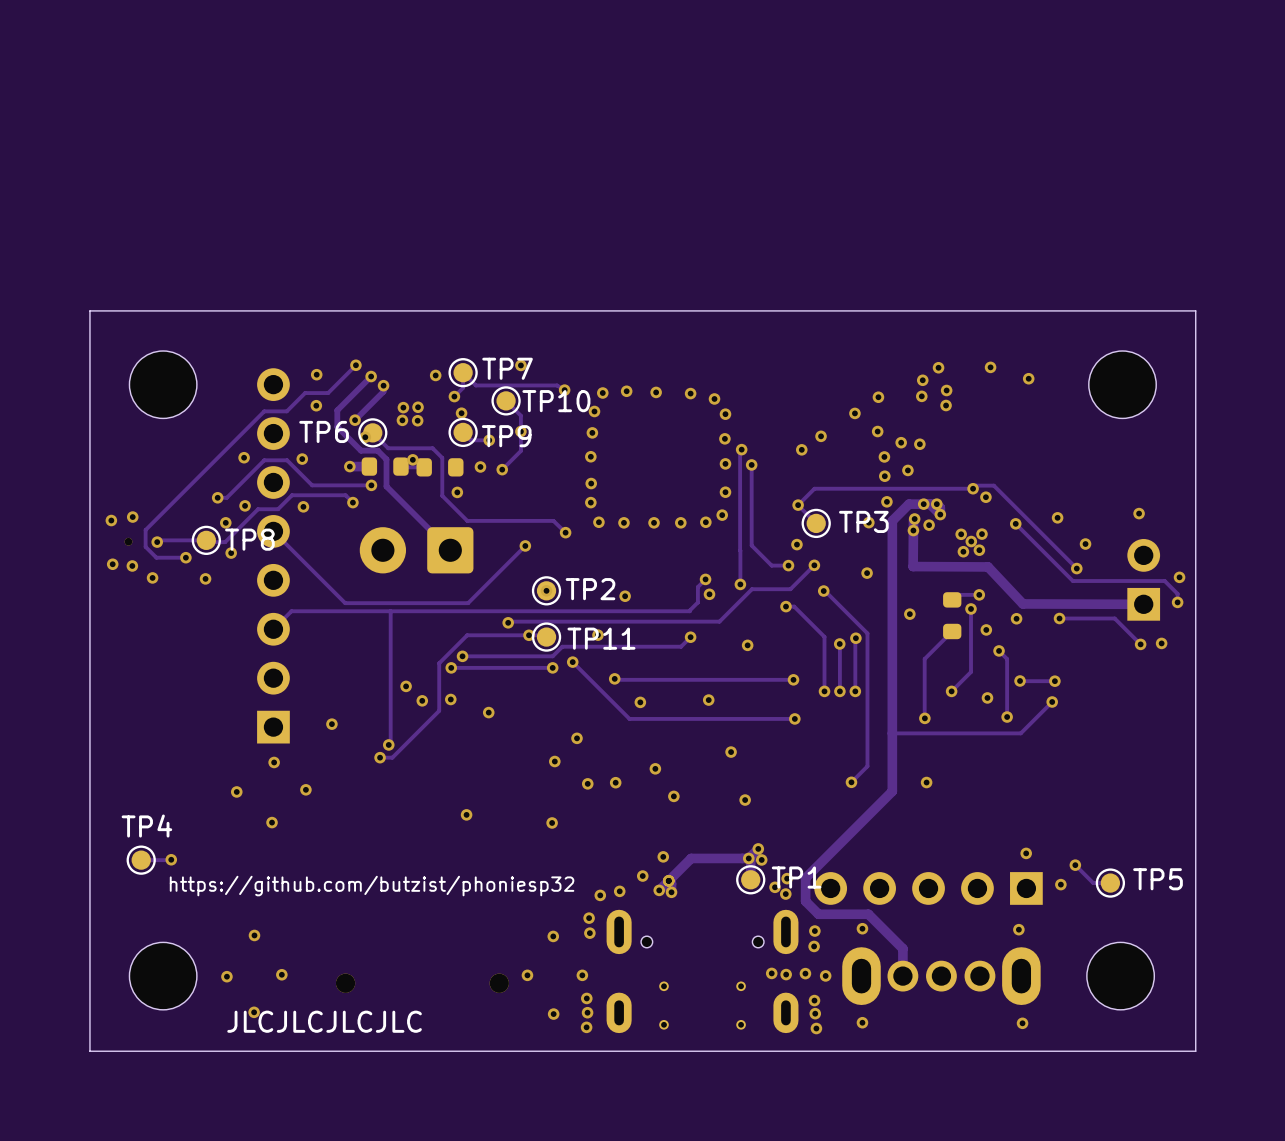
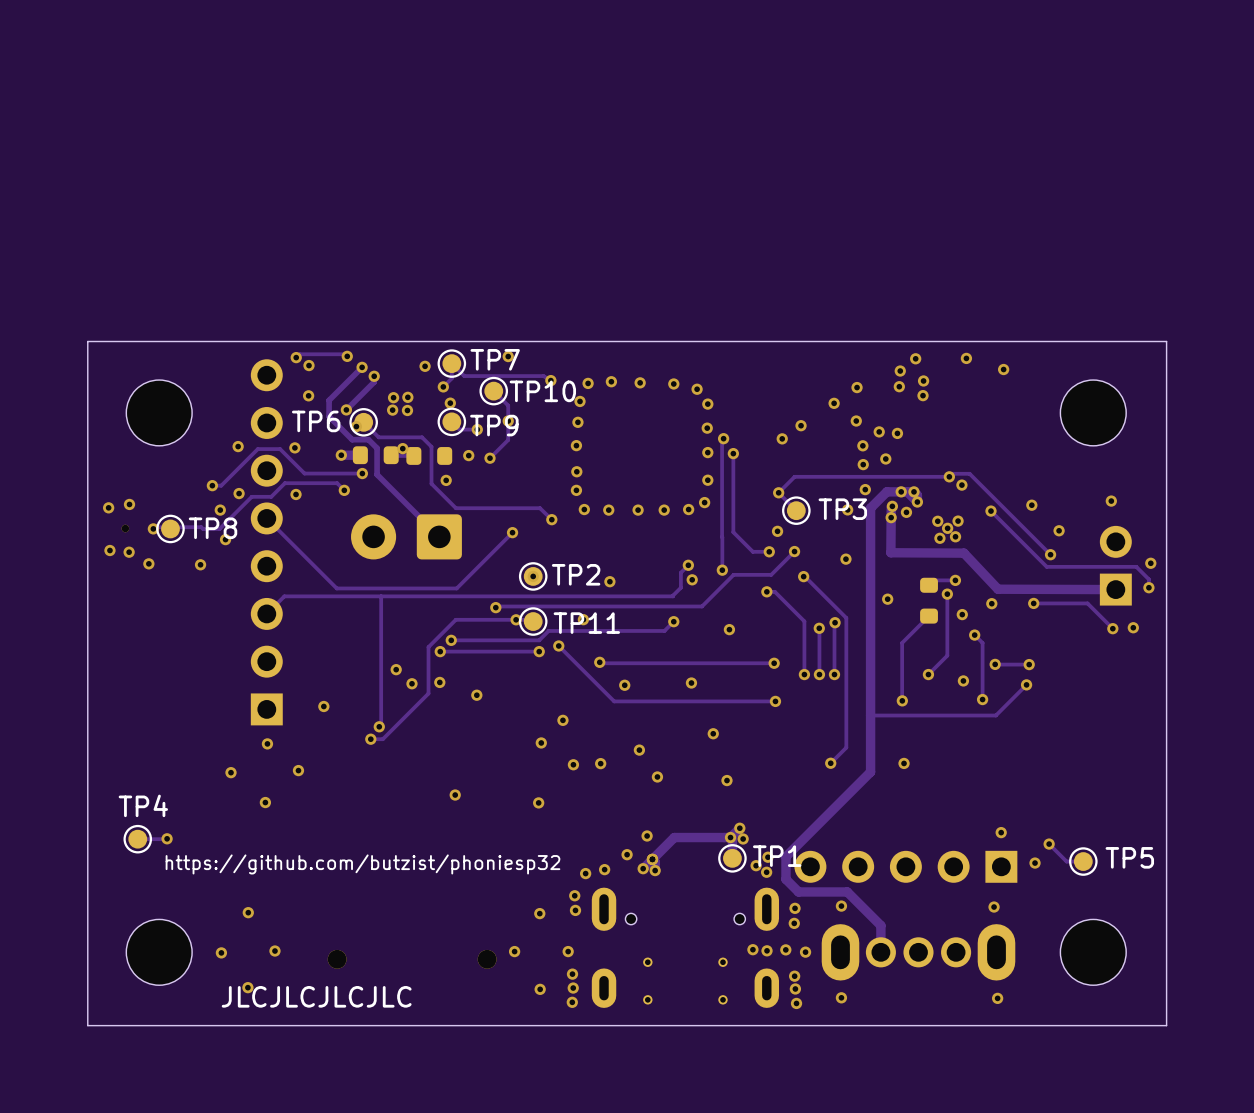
board edge: (1195, 350) (1195, 310) (89, 310) (89, 350) -> (1166, 341) (87, 341)
track: none -> (344, 354) (299, 354) (296, 357)
track: (355, 365) (328, 393) (305, 393) (286, 411) (264, 411) (145, 530) (145, 546) (156, 557) (185, 557) -> none
via: none -> (296, 357)
part position: (163, 384) -> (159, 412)
part position: (1122, 384) -> (1093, 412)
TP8 position: (206, 540) -> (170, 528)
via: (185, 557) -> none

